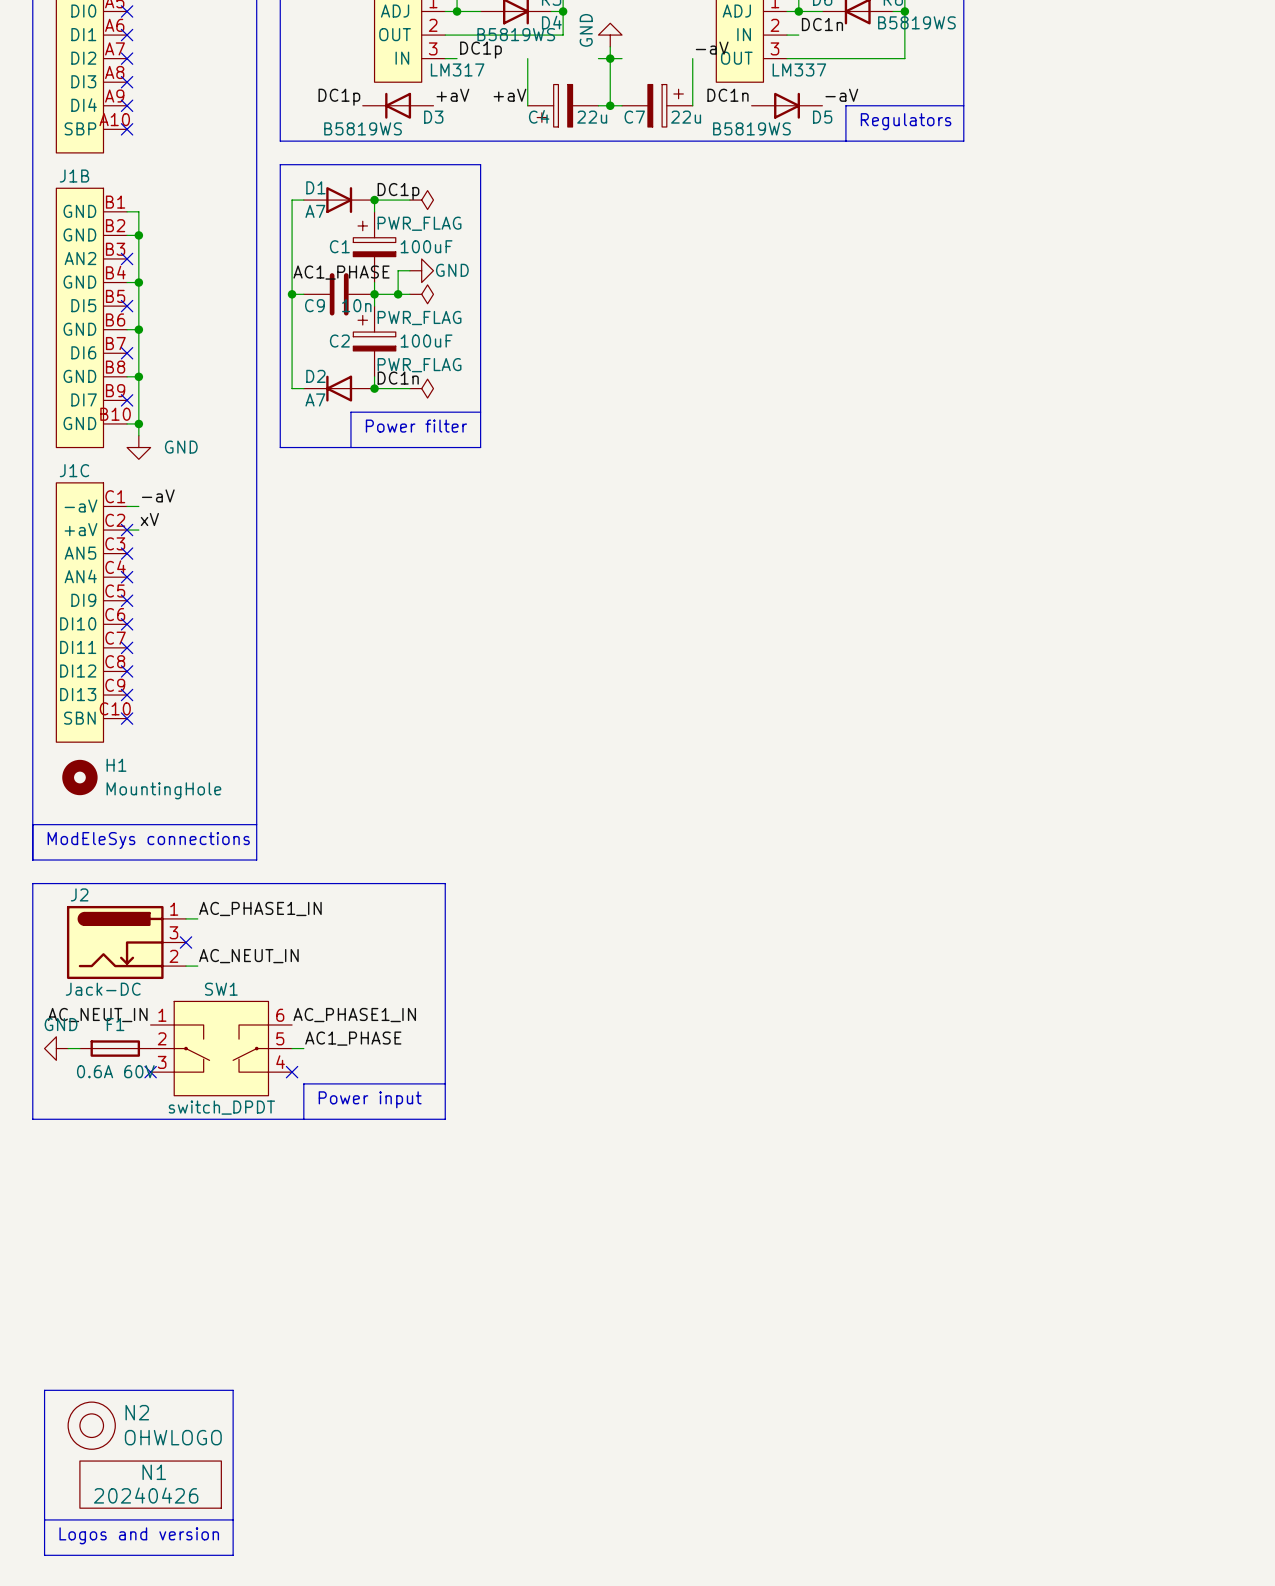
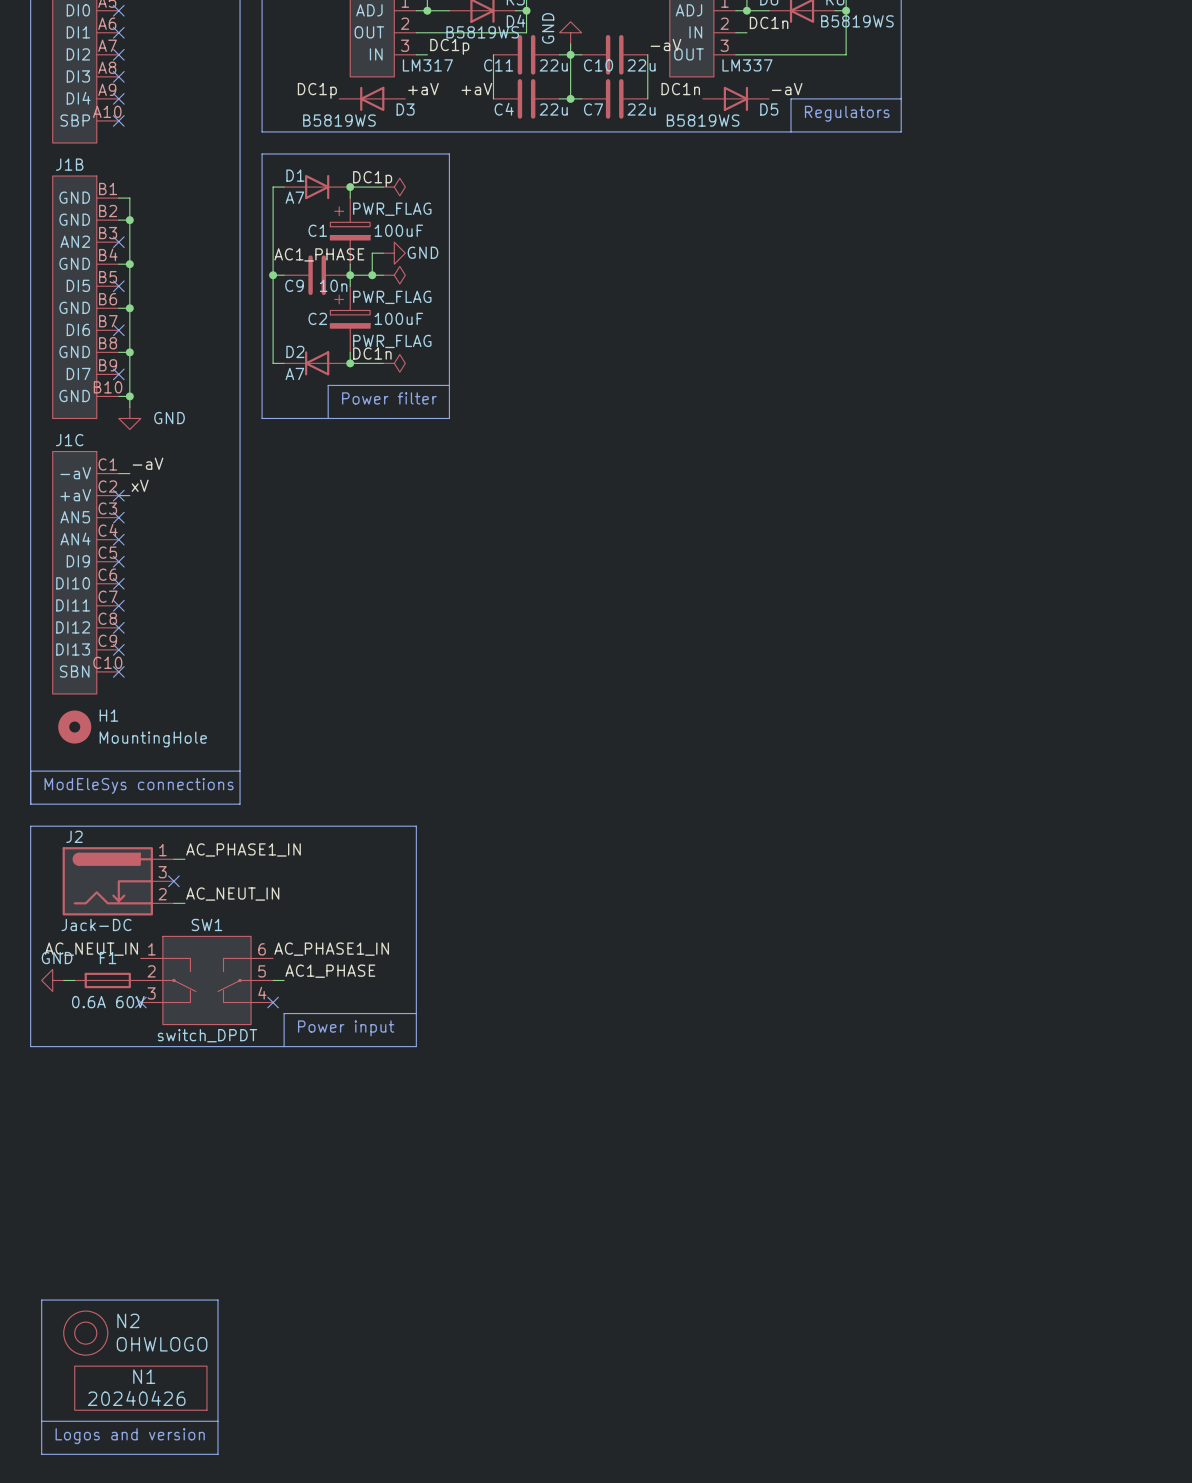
C11: none -> 22u (526, 54)
C10: none -> 22u (614, 54)
C4 symbol: [527, 84, 599, 127] -> [493, 79, 560, 119]
C7 symbol: [622, 84, 693, 127] -> [581, 79, 648, 119]

